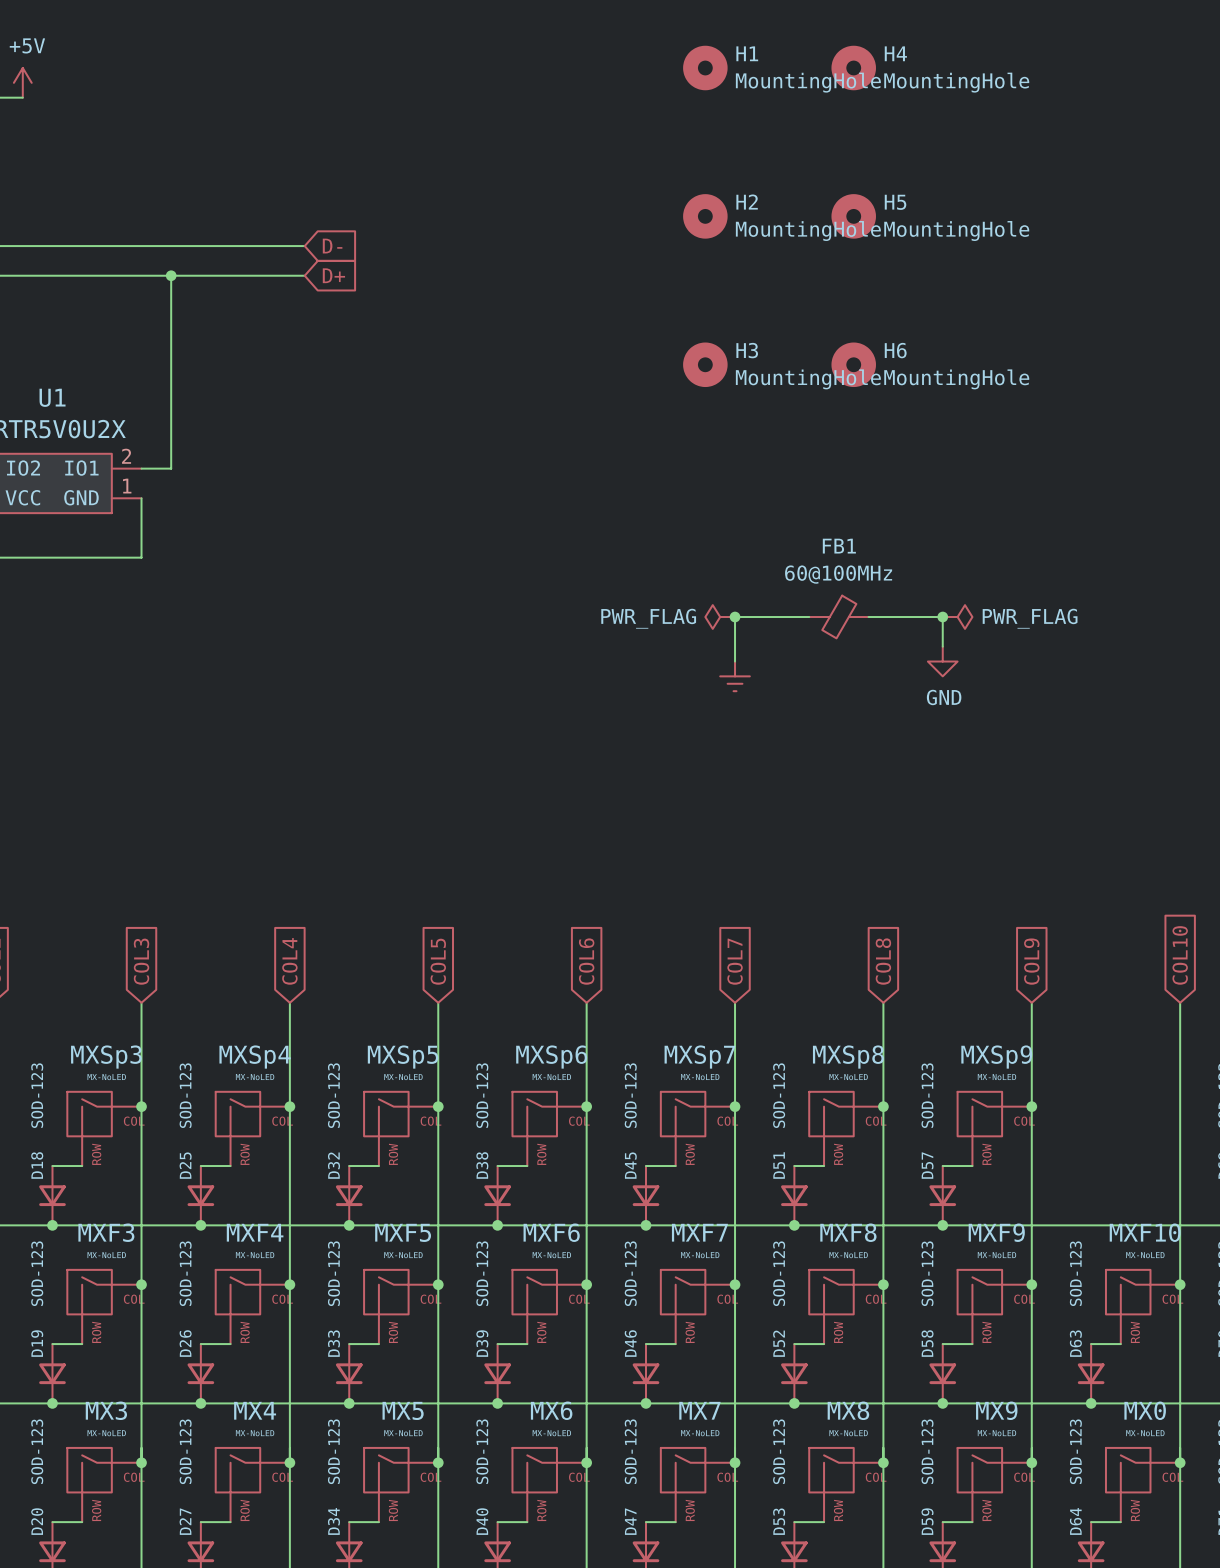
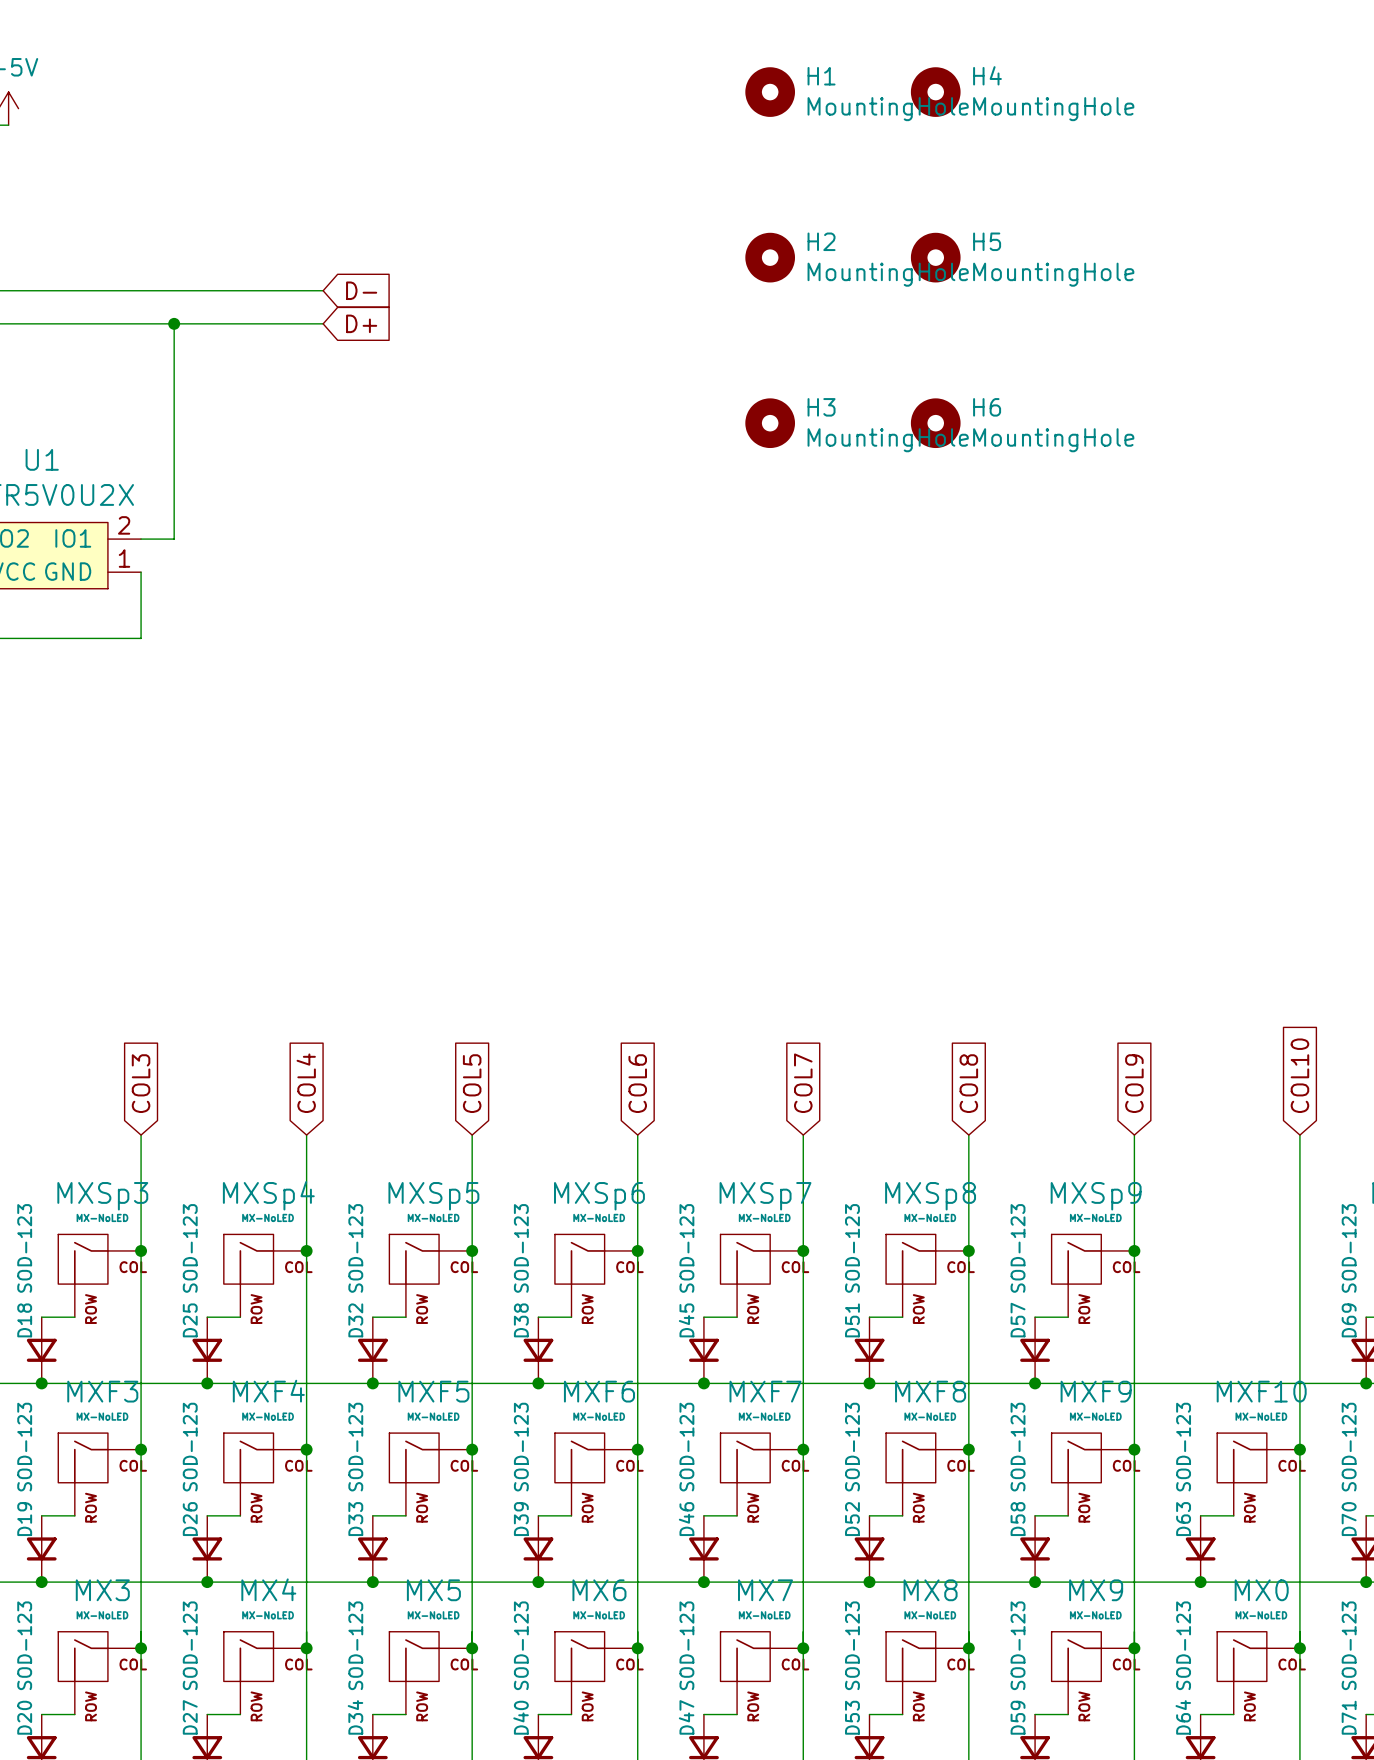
power symbol: PWR_FLAG (720, 617) -> none
junction: (735, 617) -> none
wire: (809, 617) (735, 617) (735, 661) -> none
FB1: 60@100MHz (838, 617) -> none
wire: (868, 617) (942, 617) (942, 646) -> none
junction: (942, 617) -> none
power symbol: PWR_FLAG (957, 617) -> none
power symbol: GND (942, 661) -> none
power symbol: (735, 676) -> none

